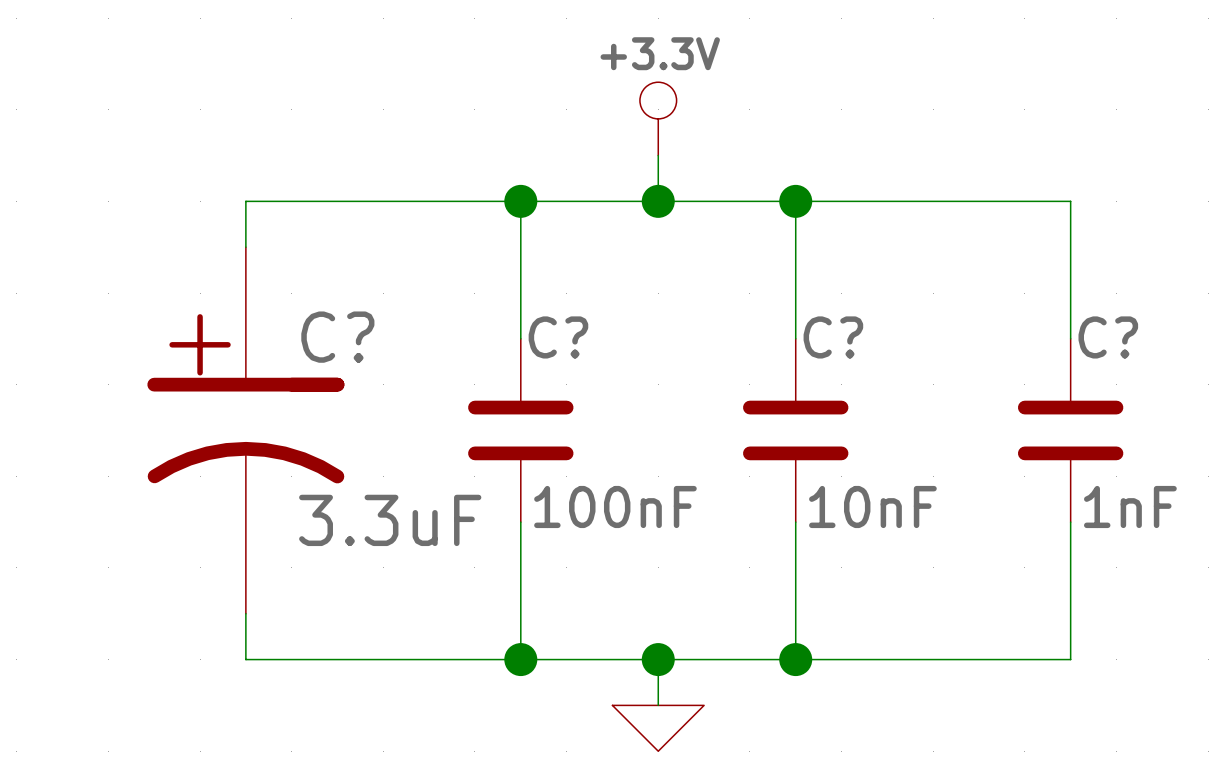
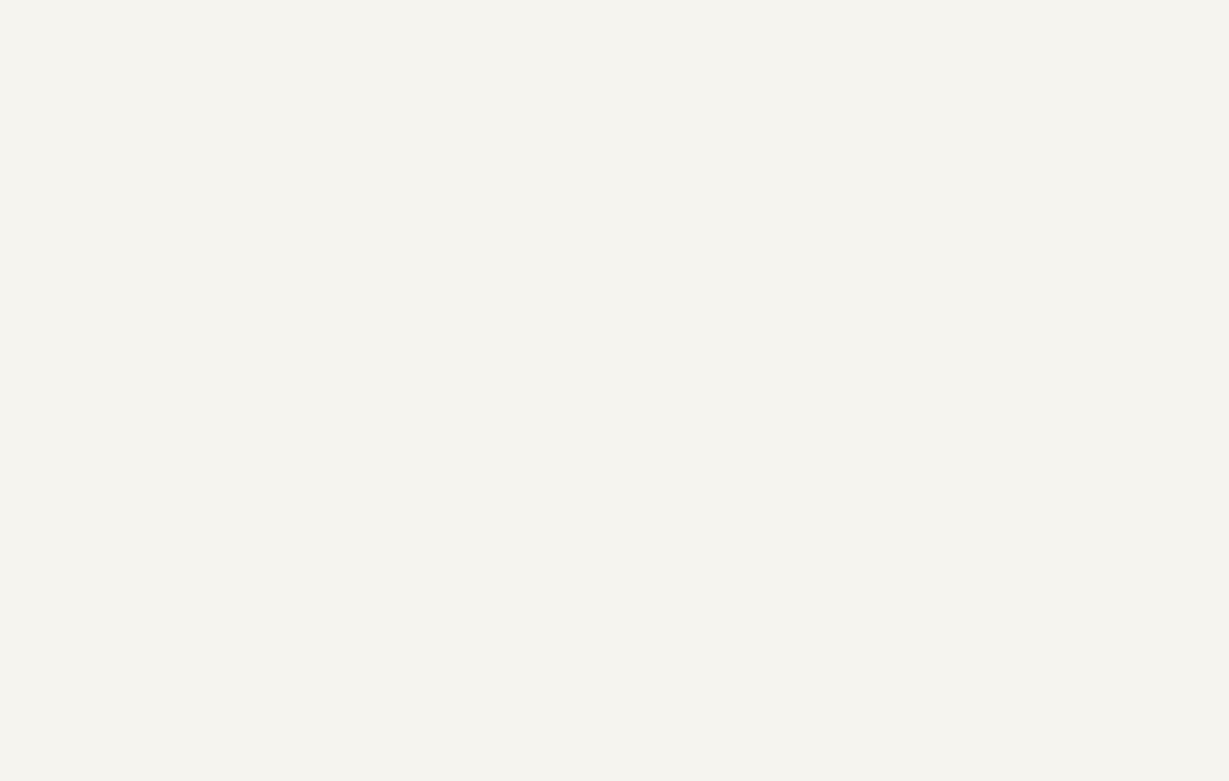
power symbol: +3.3V (658, 118) -> none
wire: (658, 155) (658, 201) -> none
wire: (520, 201) (520, 338) -> none
junction: (520, 201) -> none
junction: (658, 201) -> none
wire: (795, 201) (795, 338) -> none
junction: (795, 201) -> none
wire: (245, 247) (245, 201) (1070, 201) (1070, 338) -> none
C?: 3.3uF (245, 430) -> none
C?: 100nF (520, 430) -> none
C?: 10nF (795, 430) -> none
C?: 1nF (1070, 430) -> none
wire: (520, 522) (520, 659) -> none
wire: (795, 522) (795, 659) -> none
wire: (1070, 522) (1070, 659) (245, 659) (245, 613) -> none
junction: (520, 659) -> none
wire: (658, 659) (658, 705) -> none
junction: (658, 659) -> none
junction: (795, 659) -> none
power symbol: (658, 728) -> none

